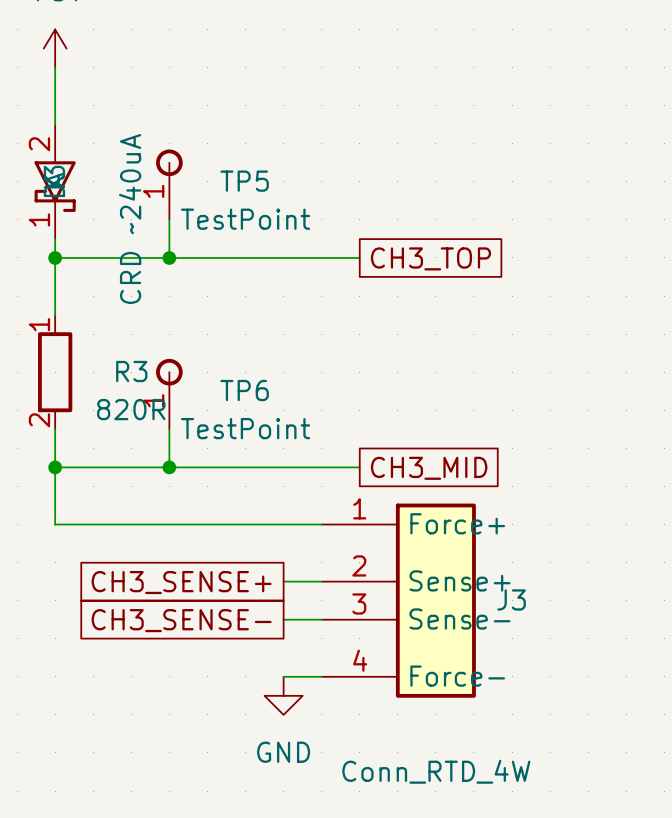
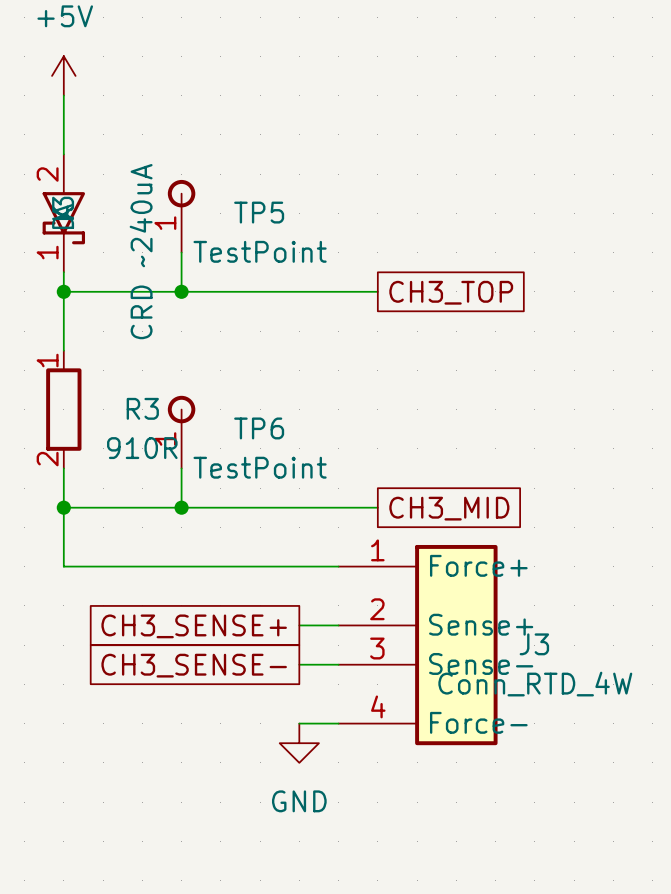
R3 value: 820R (131, 409) -> 910R (142, 448)
J3 value position: Conn_RTD_4W (436, 771) -> Conn_RTD_4W (535, 684)

